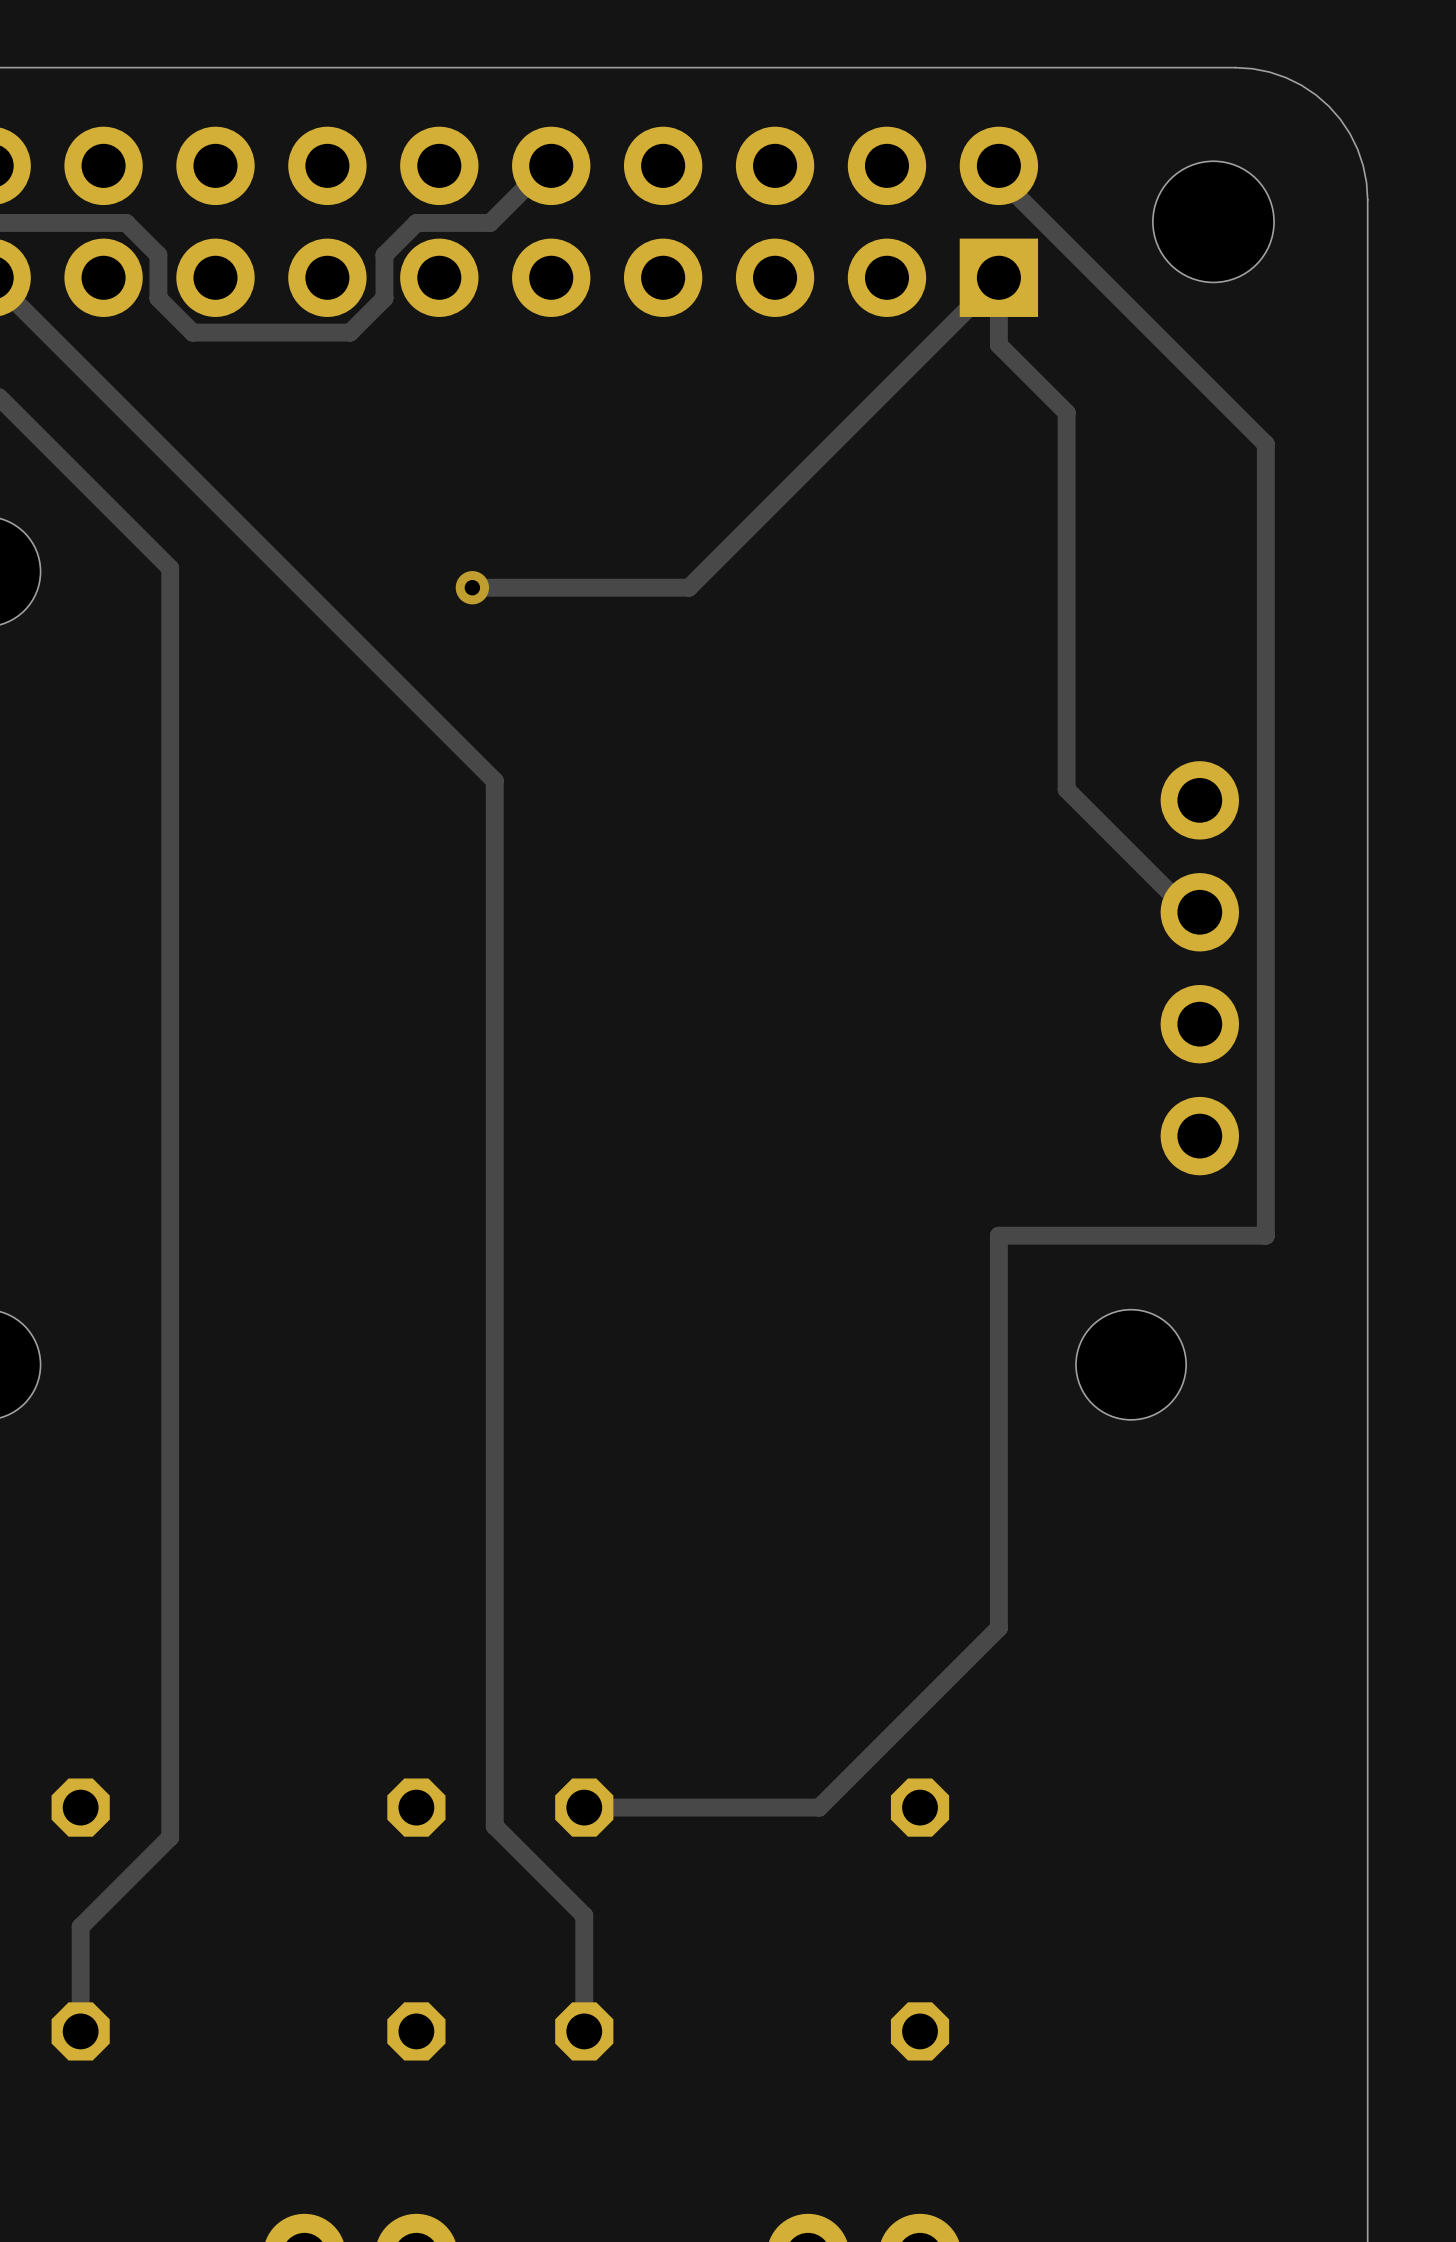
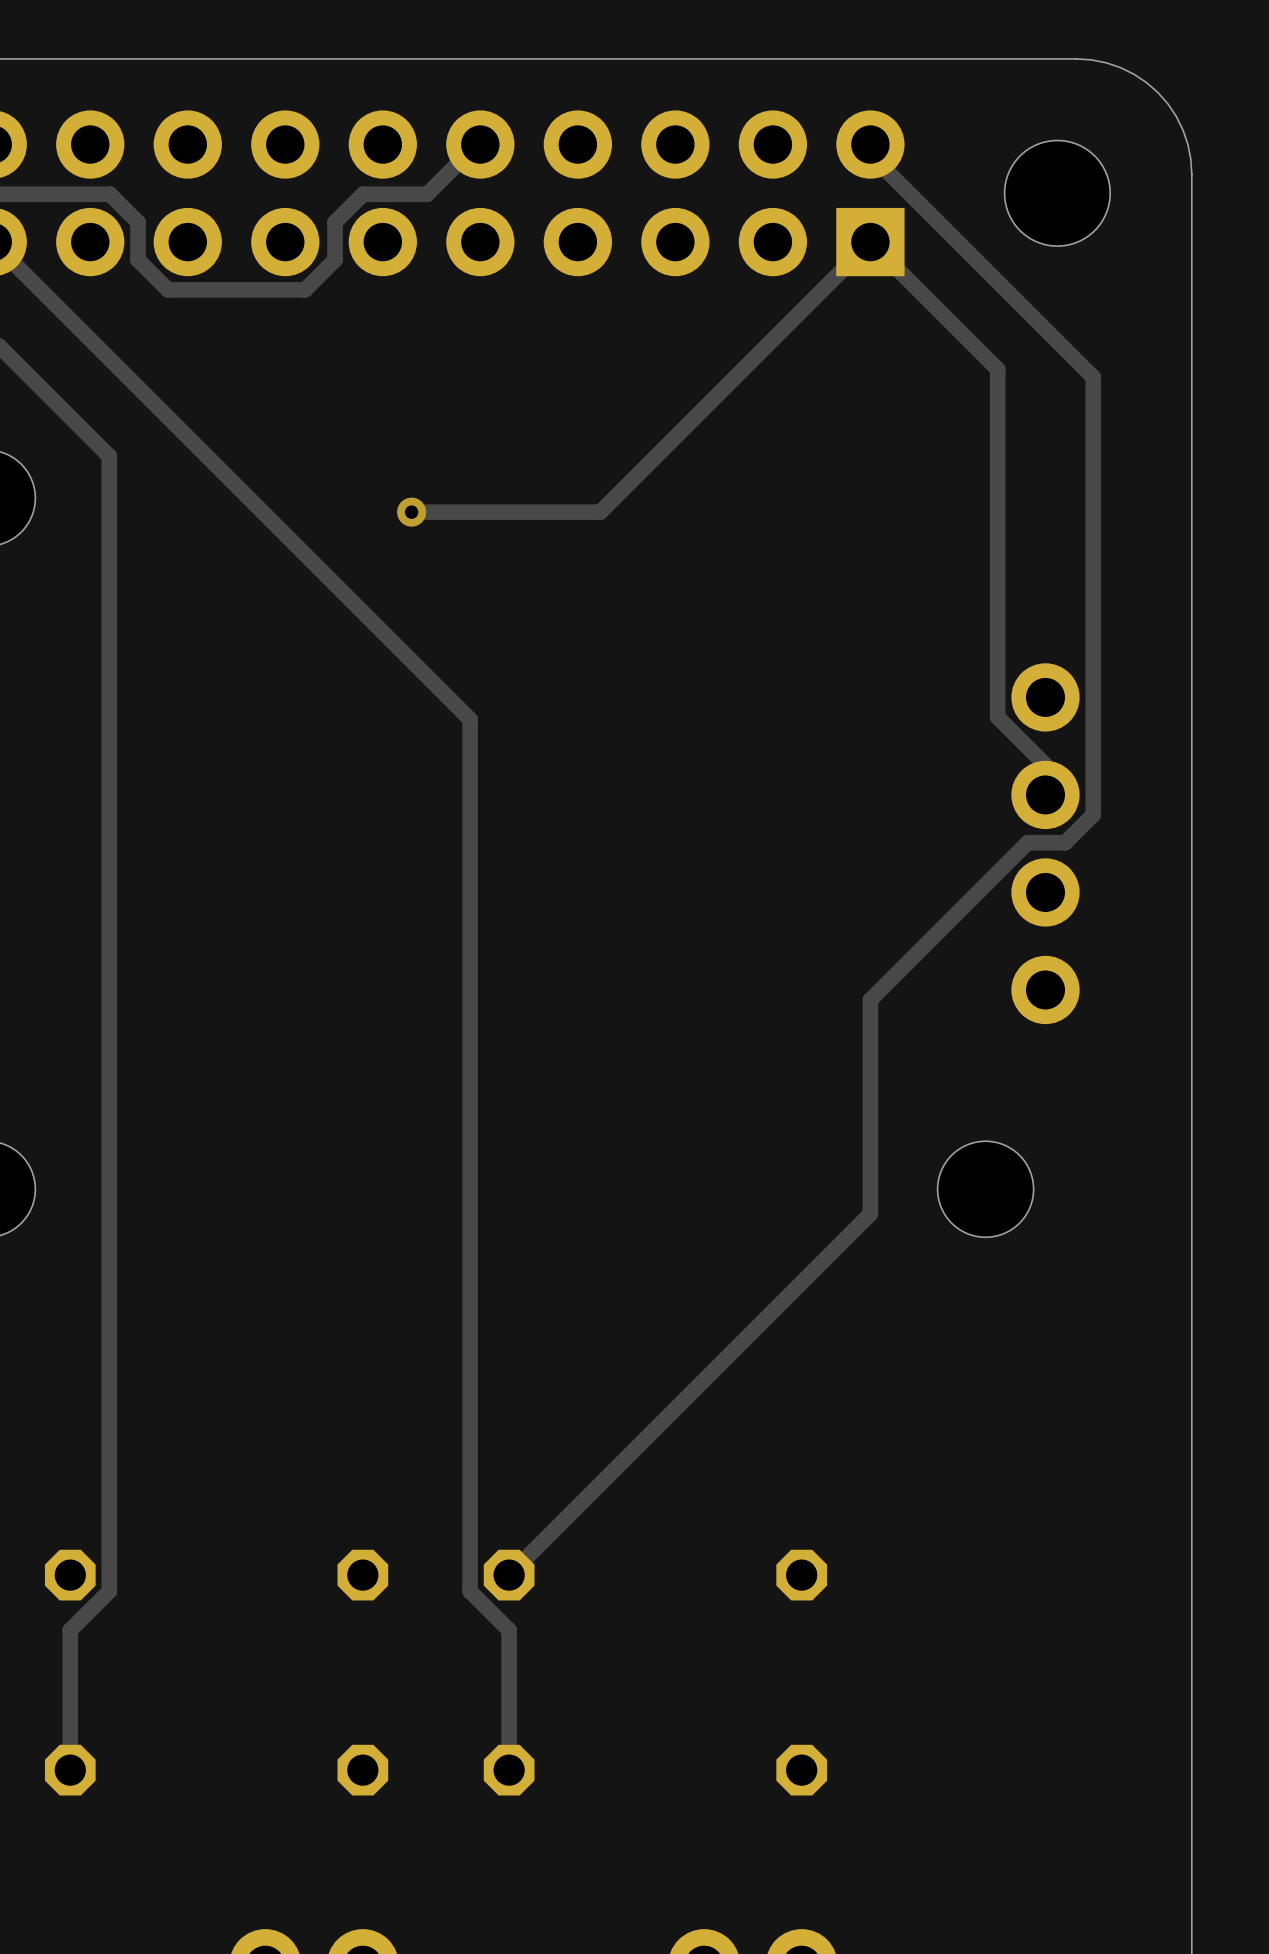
track: (998, 277) (998, 344) (1066, 412) (1066, 789) (1189, 912) (1199, 912) -> (870, 242) (997, 369) (997, 717) (1045, 764) (1045, 794)
track: (1254, 433) (1265, 444) (1265, 1235) (998, 1235) -> (1093, 377) (1093, 814) (1065, 842) (1027, 842) (870, 999) (870, 1076)
track: (125, 523) (170, 568) (170, 1837) (80, 1926) -> (109, 456) (109, 1591) (70, 1630) (70, 1679)
track: (494, 780) (494, 1826) (584, 1915) -> (431, 680) (470, 719) (470, 1591) (509, 1630) (509, 1669)
track: (998, 1392) (998, 1628) (819, 1807) (584, 1807) -> (870, 1213) (509, 1575)

